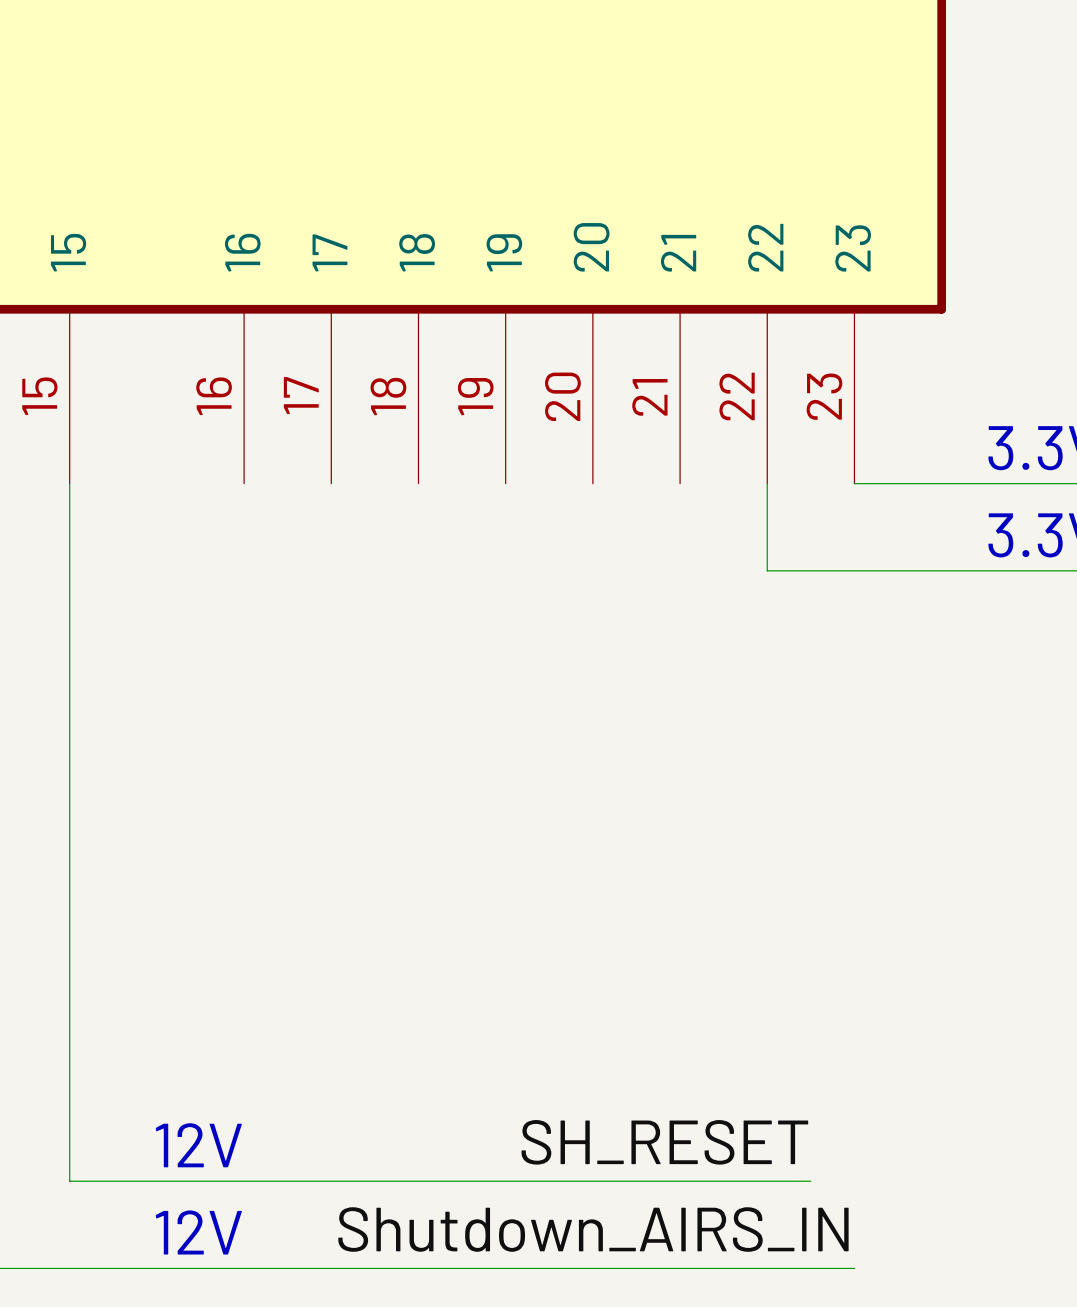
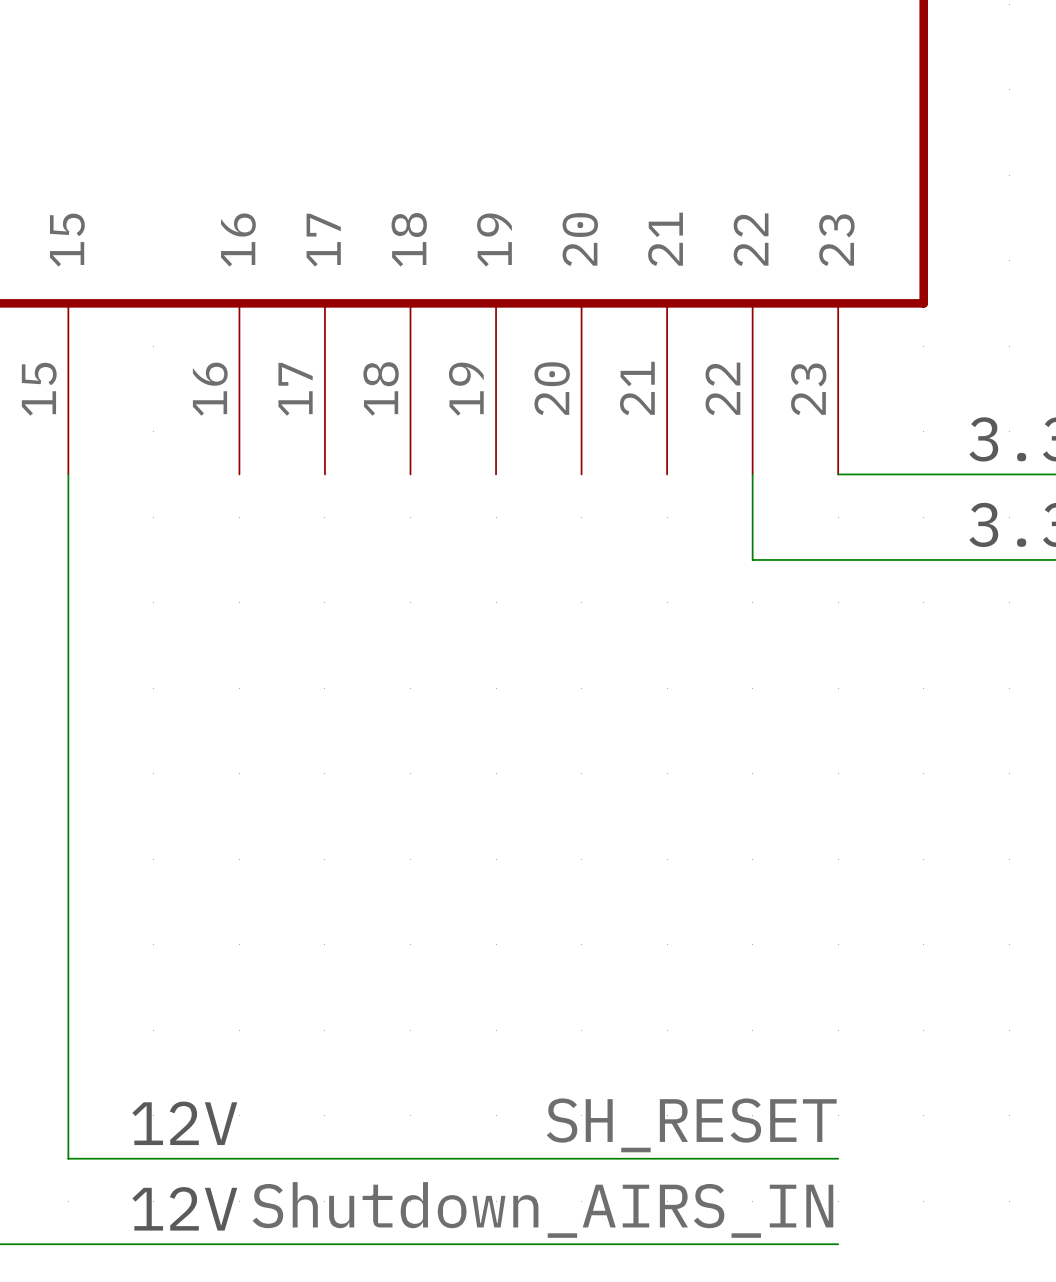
label position: SH_RESET (664, 1142) -> SH_RESET (691, 1125)
wire: none -> (795, 1158) (838, 1158)

